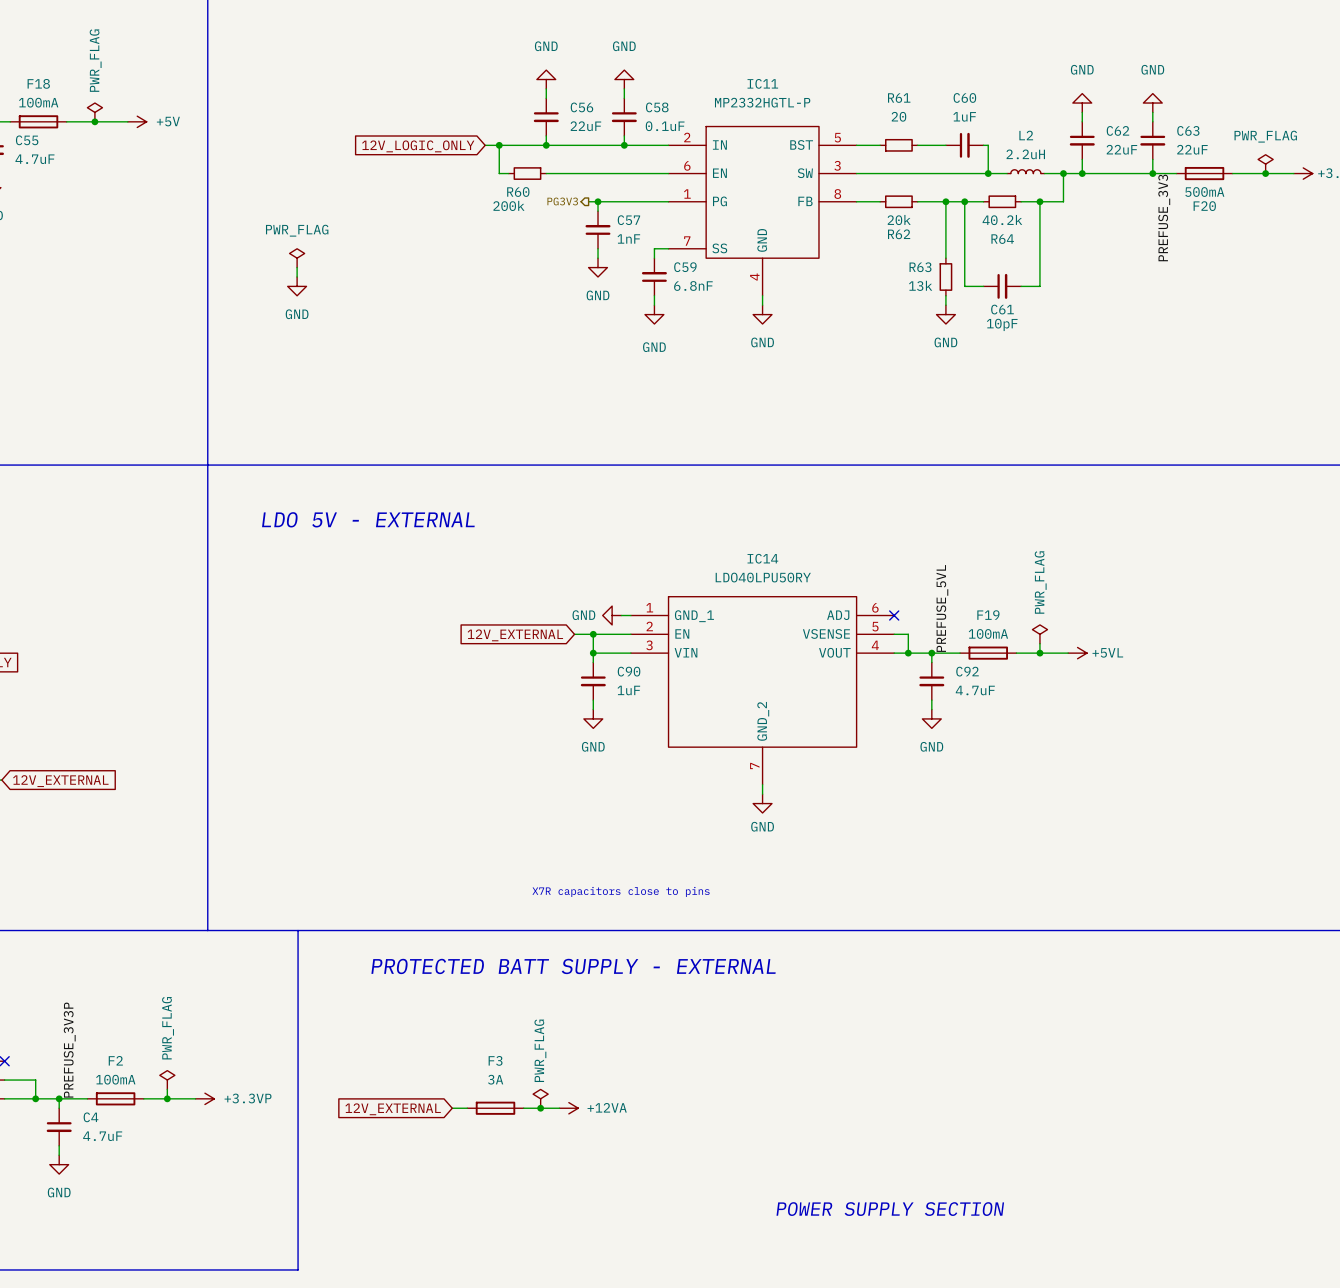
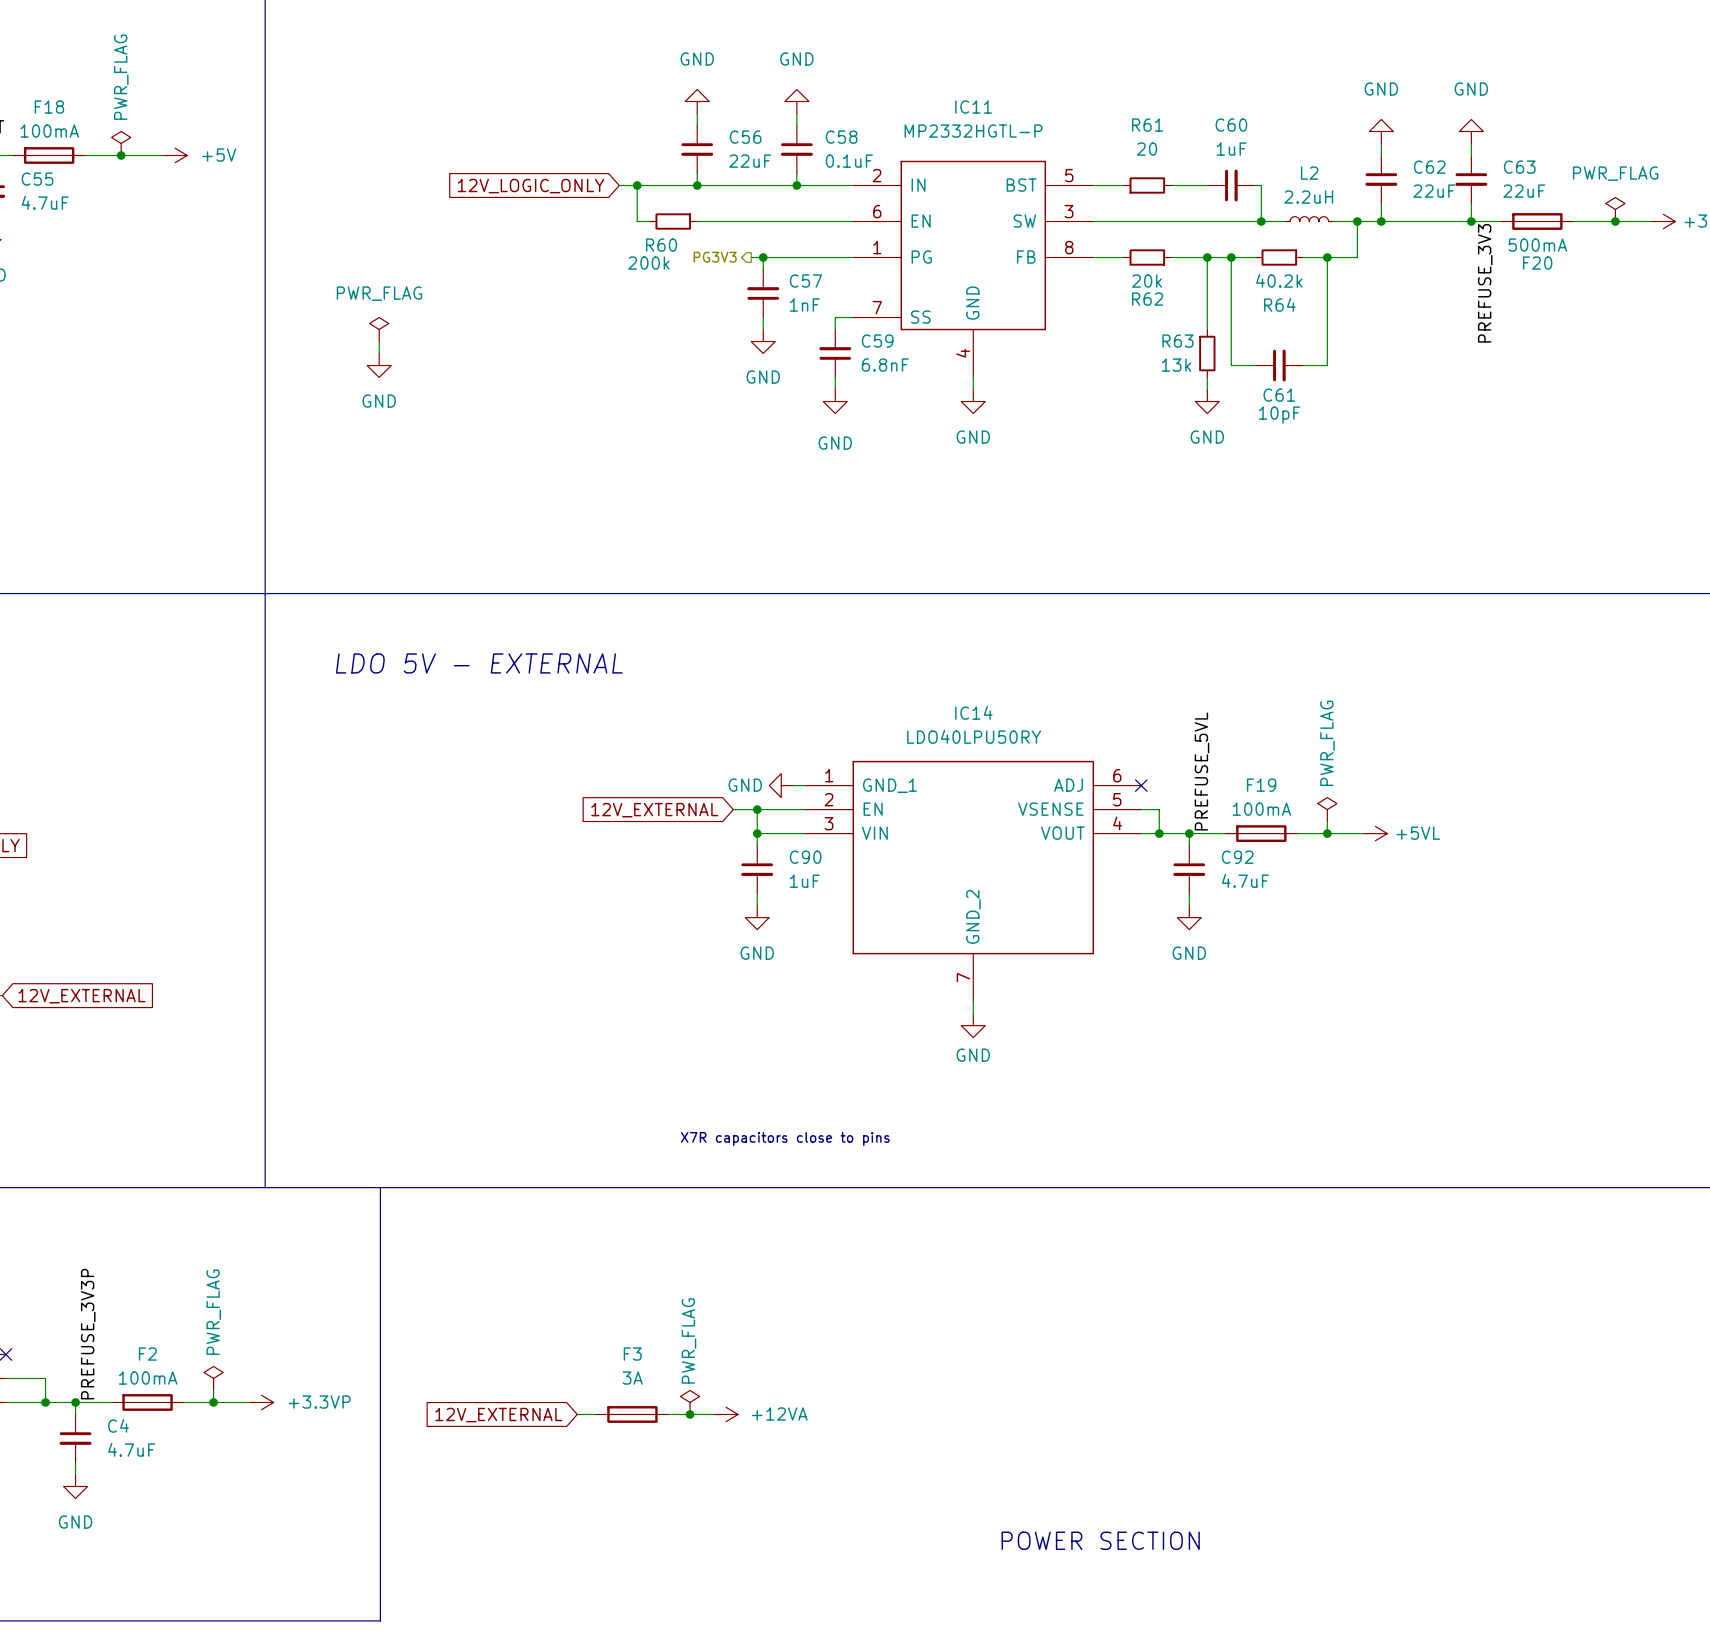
text: PROTECTED BATT SUPPLY - EXTERNAL (573, 966) -> none
text: POWER SUPPLY SECTION (890, 1209) -> POWER SECTION (1100, 1540)

